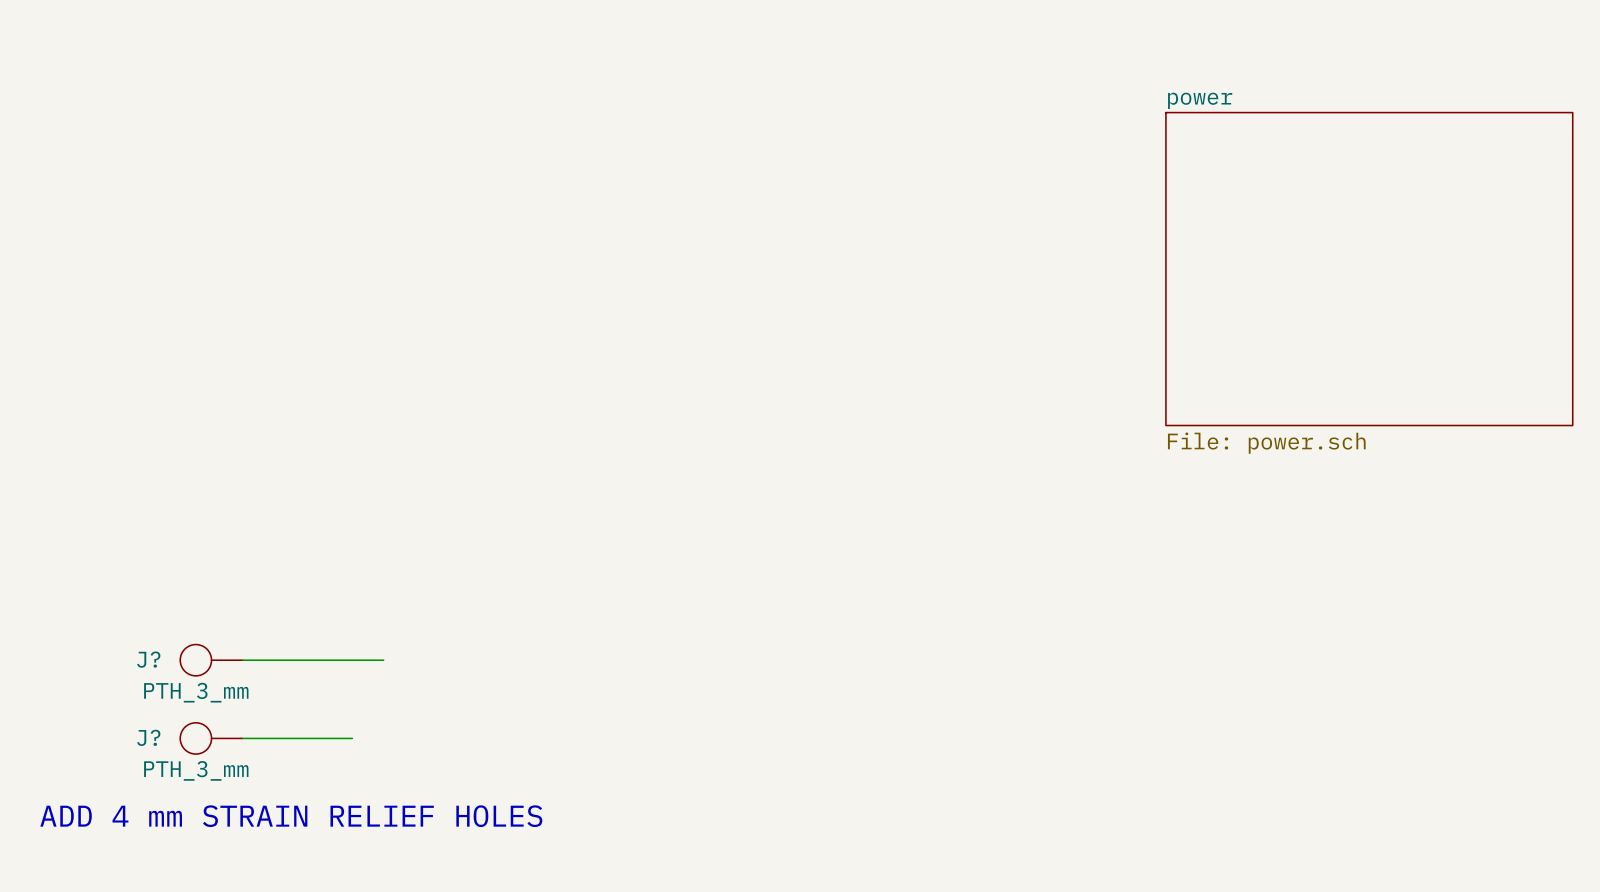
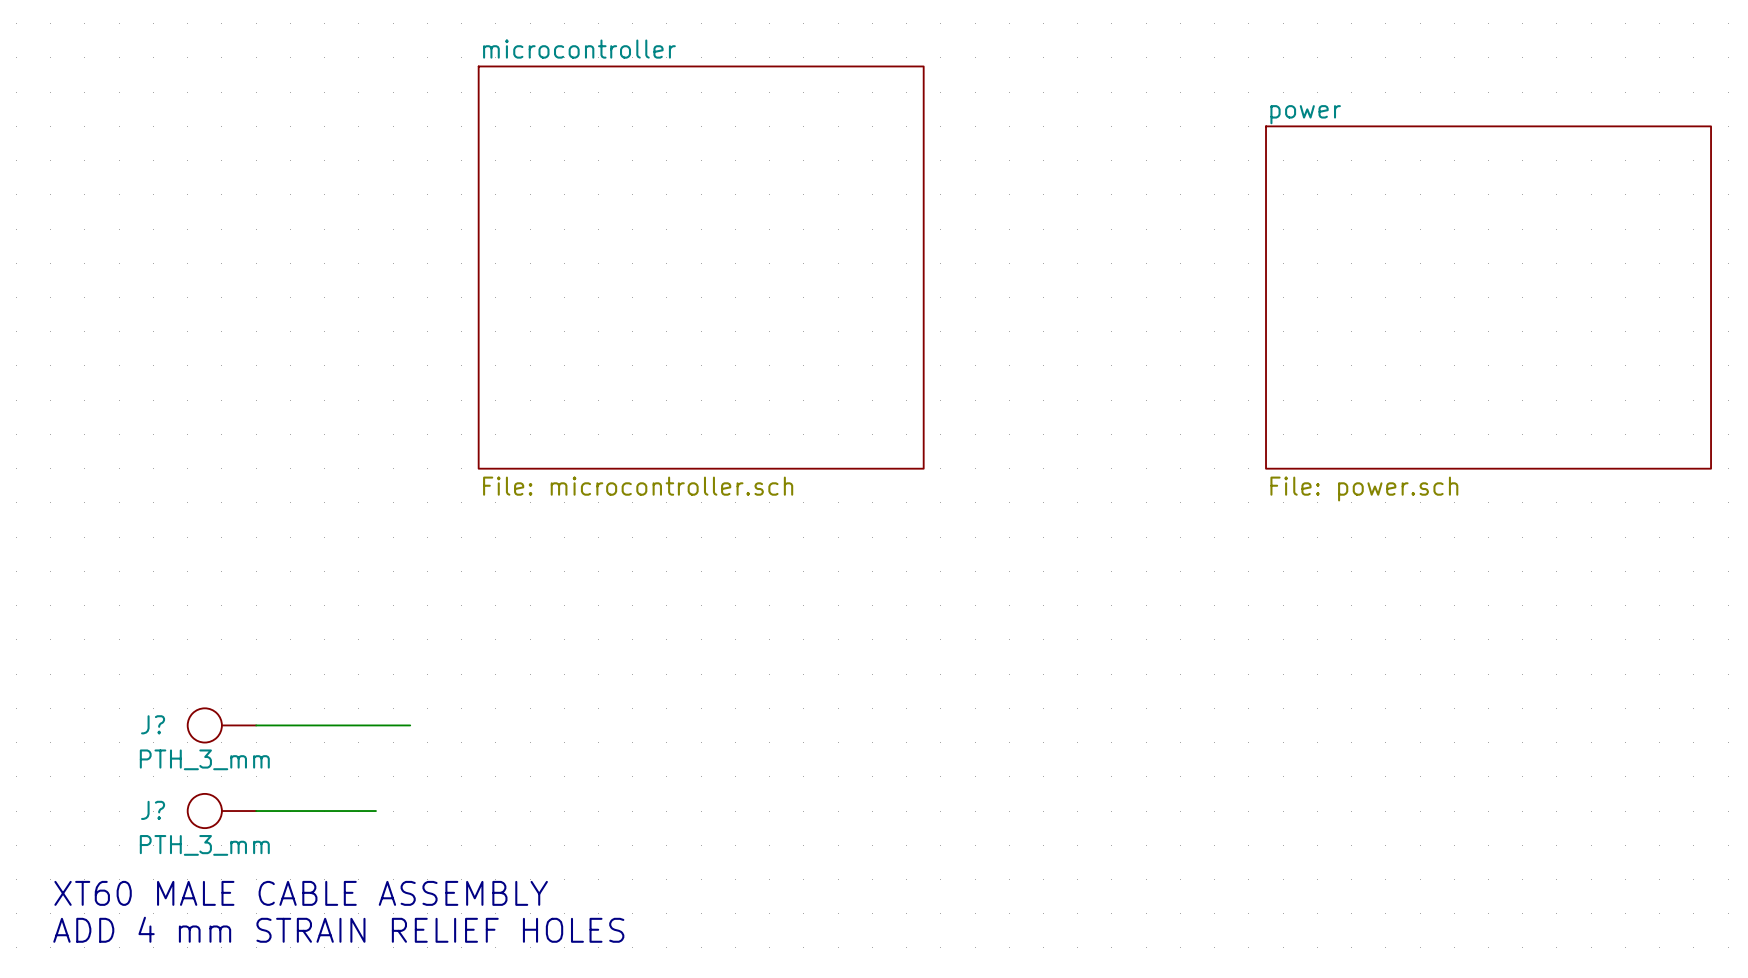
sheet microcontroller: none -> File: microcontroller.sch (701, 267)
text: none -> XT60 MALE CABLE ASSEMBLY (301, 893)
text position: ADD 4 mm STRAIN RELIEF HOLES (291, 816) -> ADD 4 mm STRAIN RELIEF HOLES (338, 929)

